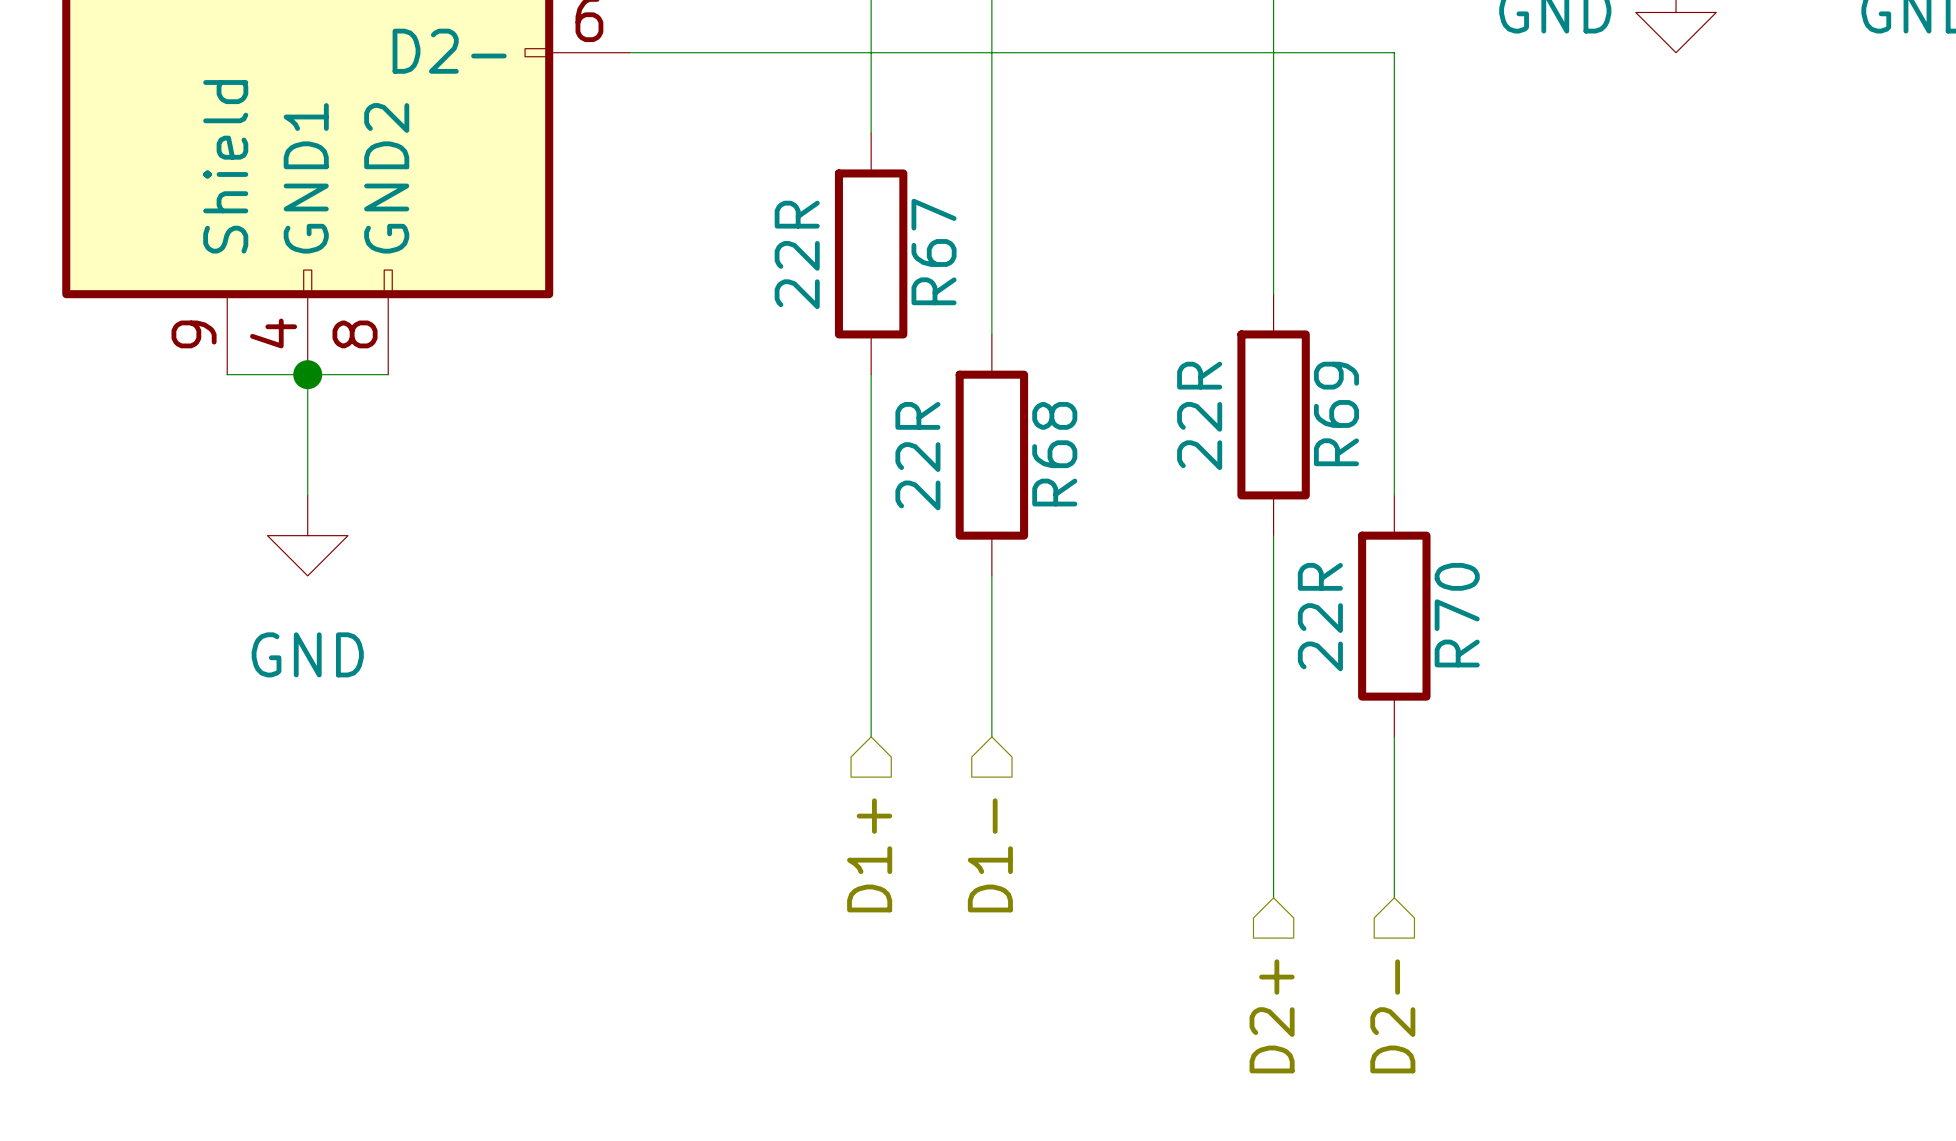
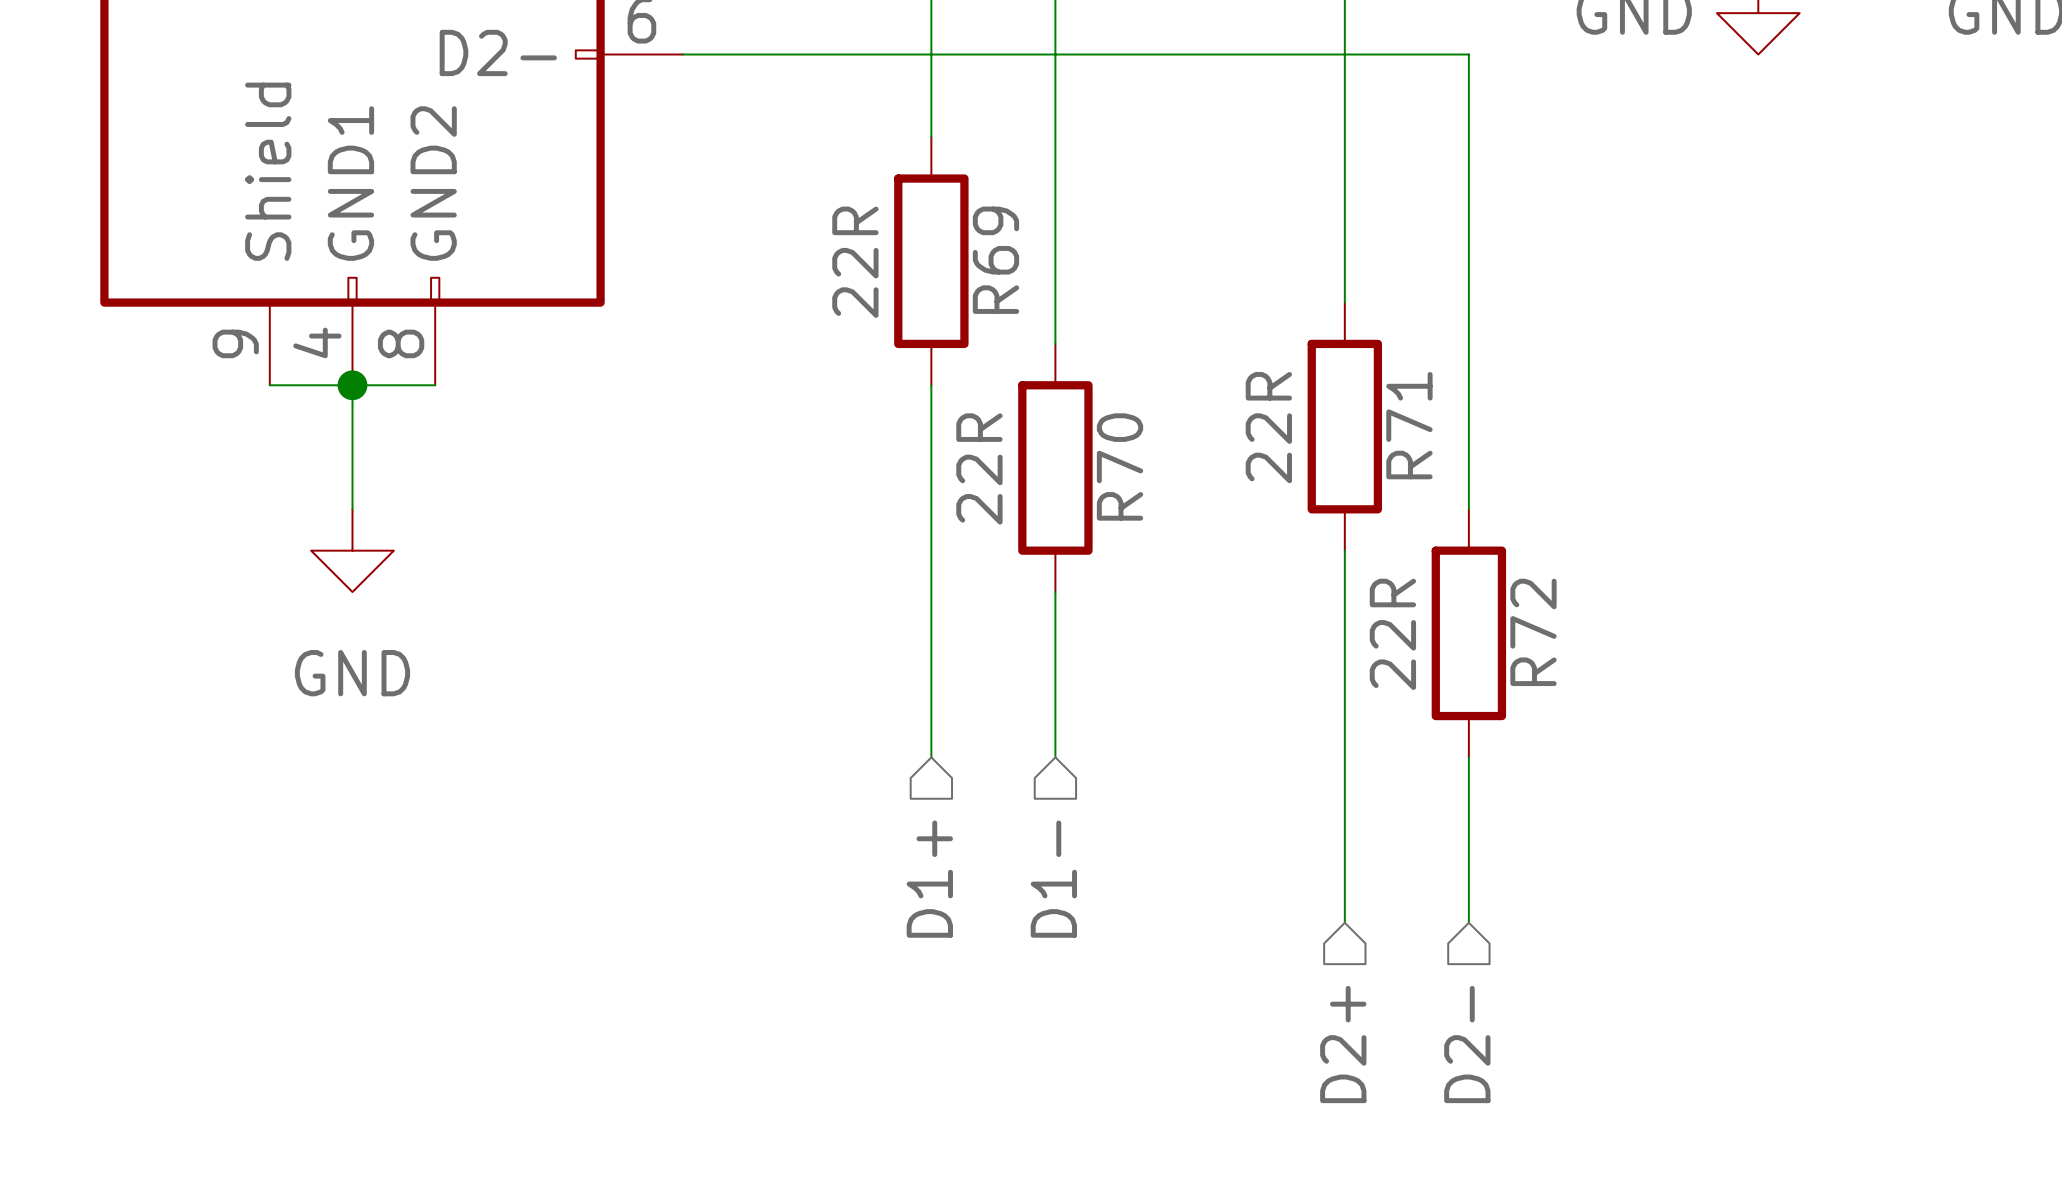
R67 name: R67 (934, 252) -> R69 (995, 260)
R69 name: R69 (1336, 413) -> R71 (1409, 425)
R68 name: R68 (1054, 454) -> R70 (1120, 466)
R70 name: R70 (1457, 615) -> R72 (1533, 632)

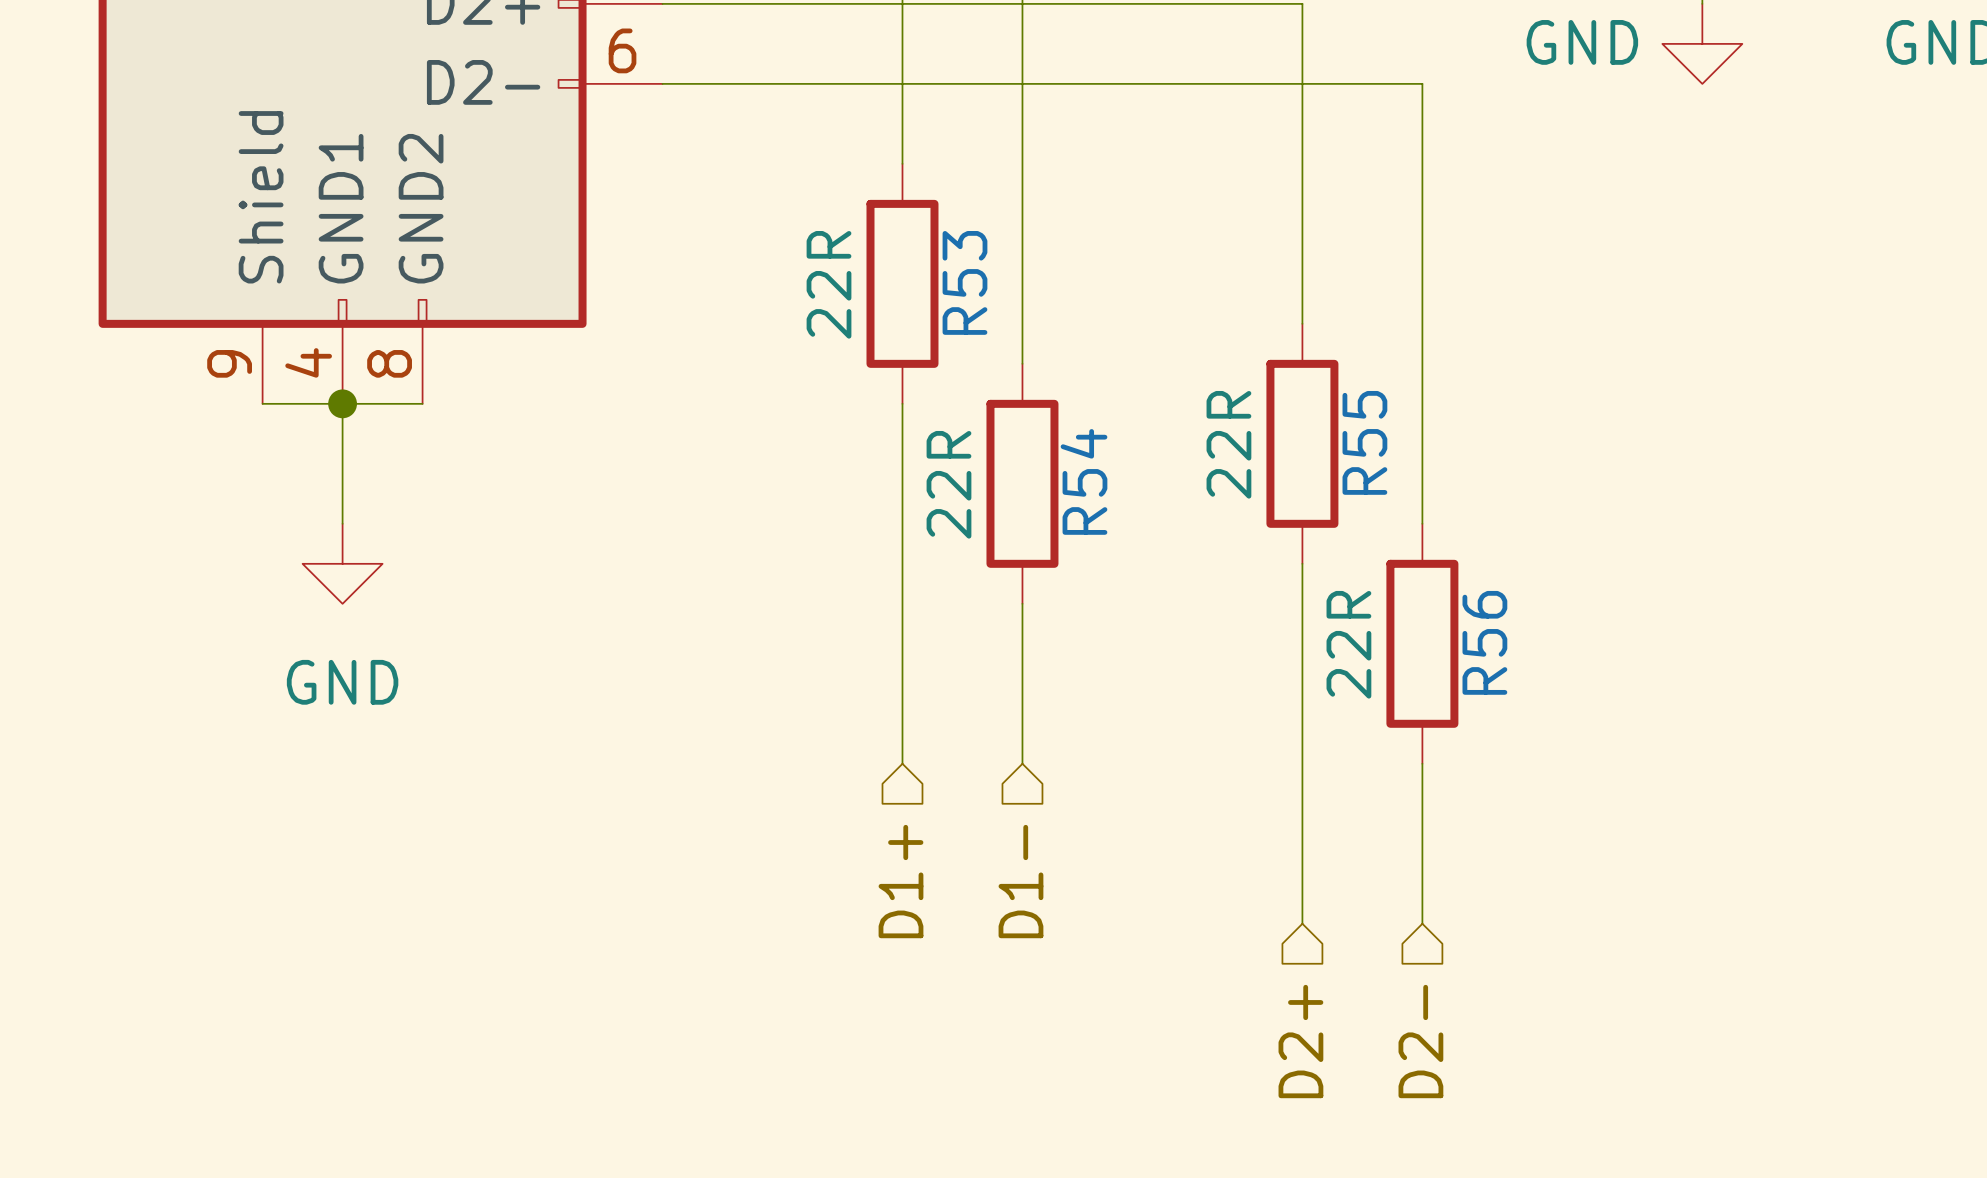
R69 name: R69 (995, 260) -> R53 (964, 282)
R71 name: R71 (1409, 425) -> R55 (1364, 442)
R70 name: R70 (1120, 466) -> R54 (1084, 481)
R72 name: R72 (1533, 632) -> R56 (1484, 642)

